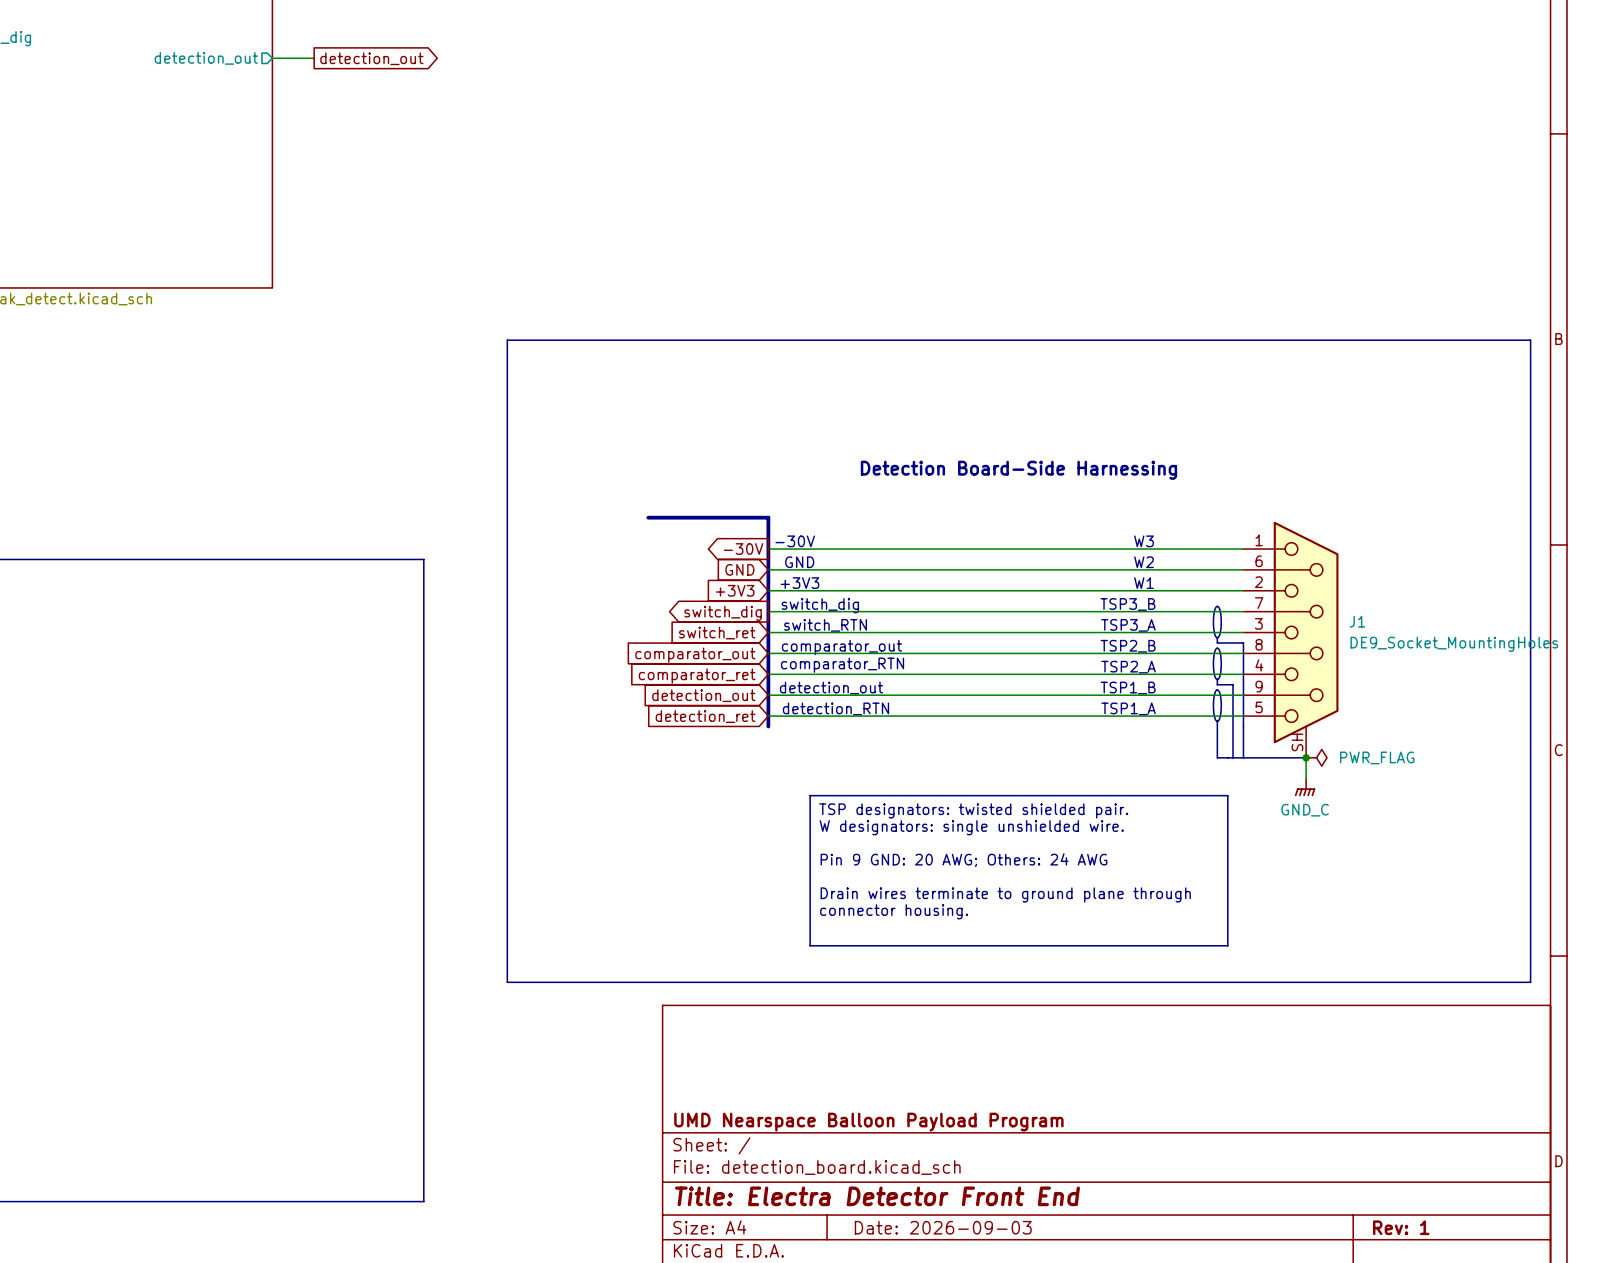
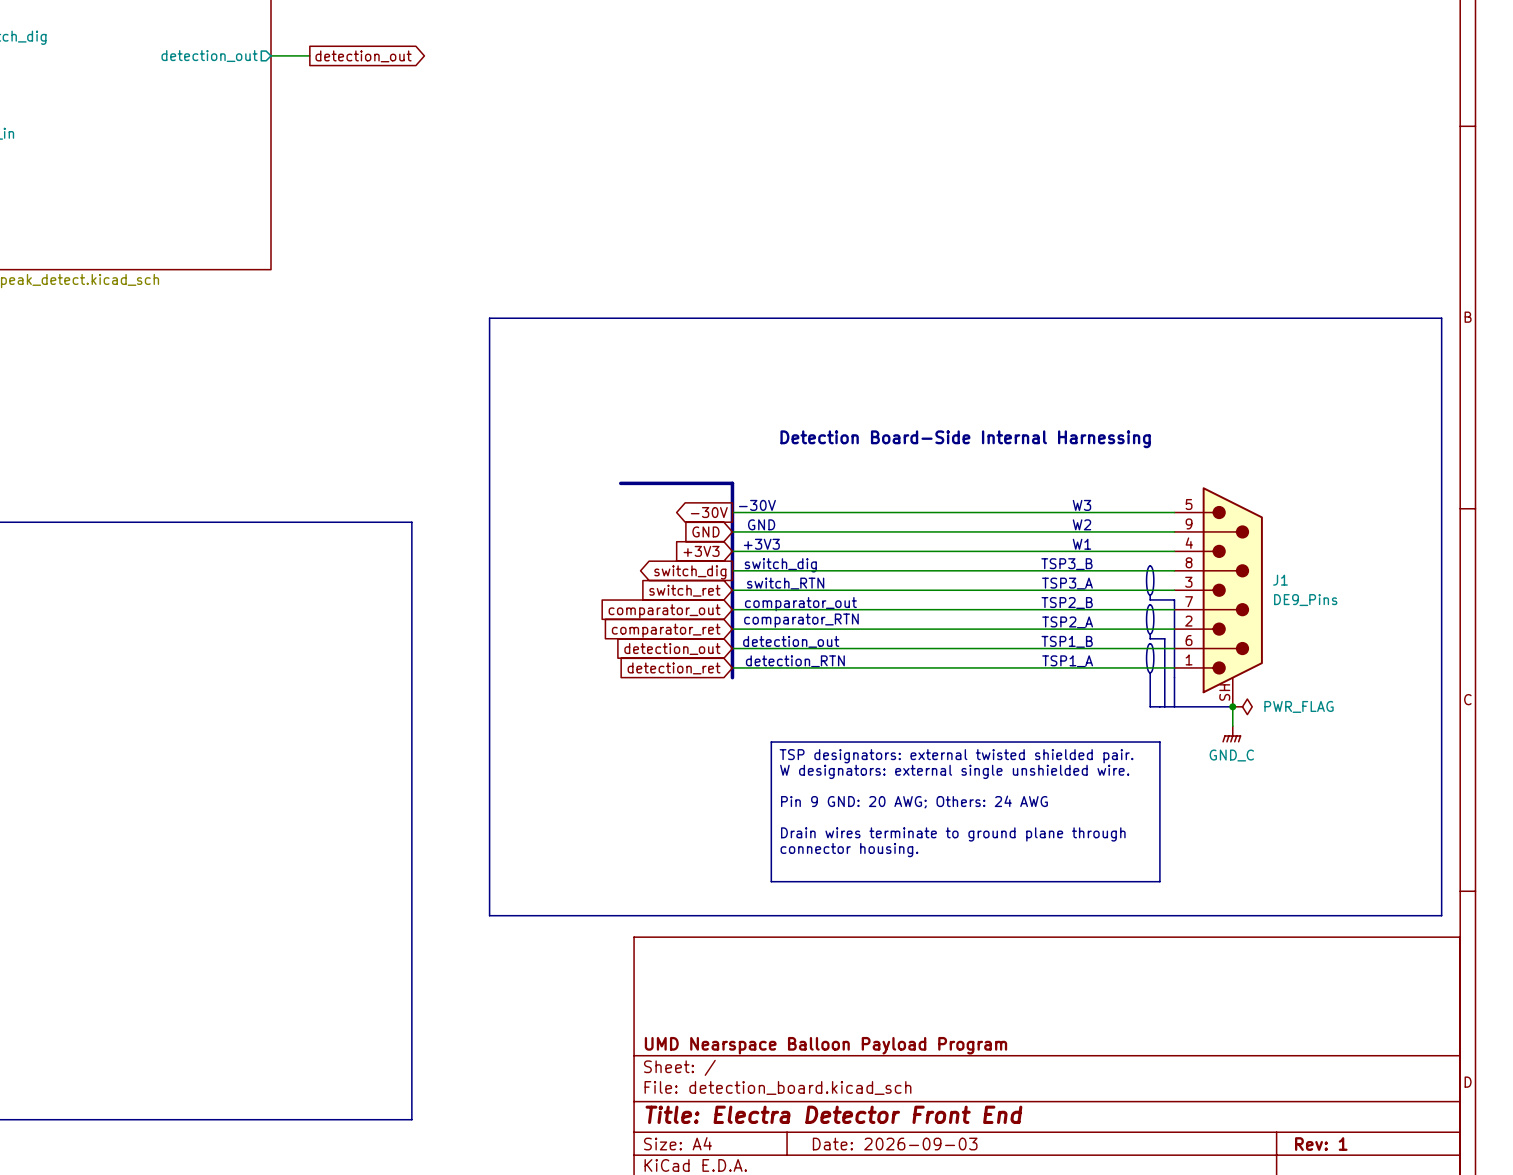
text: Detection Board-Side Harnessing (1018, 470) -> Detection Board-Side Internal Harnessing (965, 439)
J1 symbol: [1243, 521, 1339, 758] -> [1174, 487, 1263, 707]
J1 value: DE9_Socket_MountingHoles (1454, 644) -> DE9_Pins (1305, 600)
text: TSP designators: twisted shielded pair. (973, 810) -> TSP designators: external twisted shielded pair. (956, 756)
text: W designators: single unshielded wire. (971, 827) -> W designators: external single unshielded wire. (954, 771)

